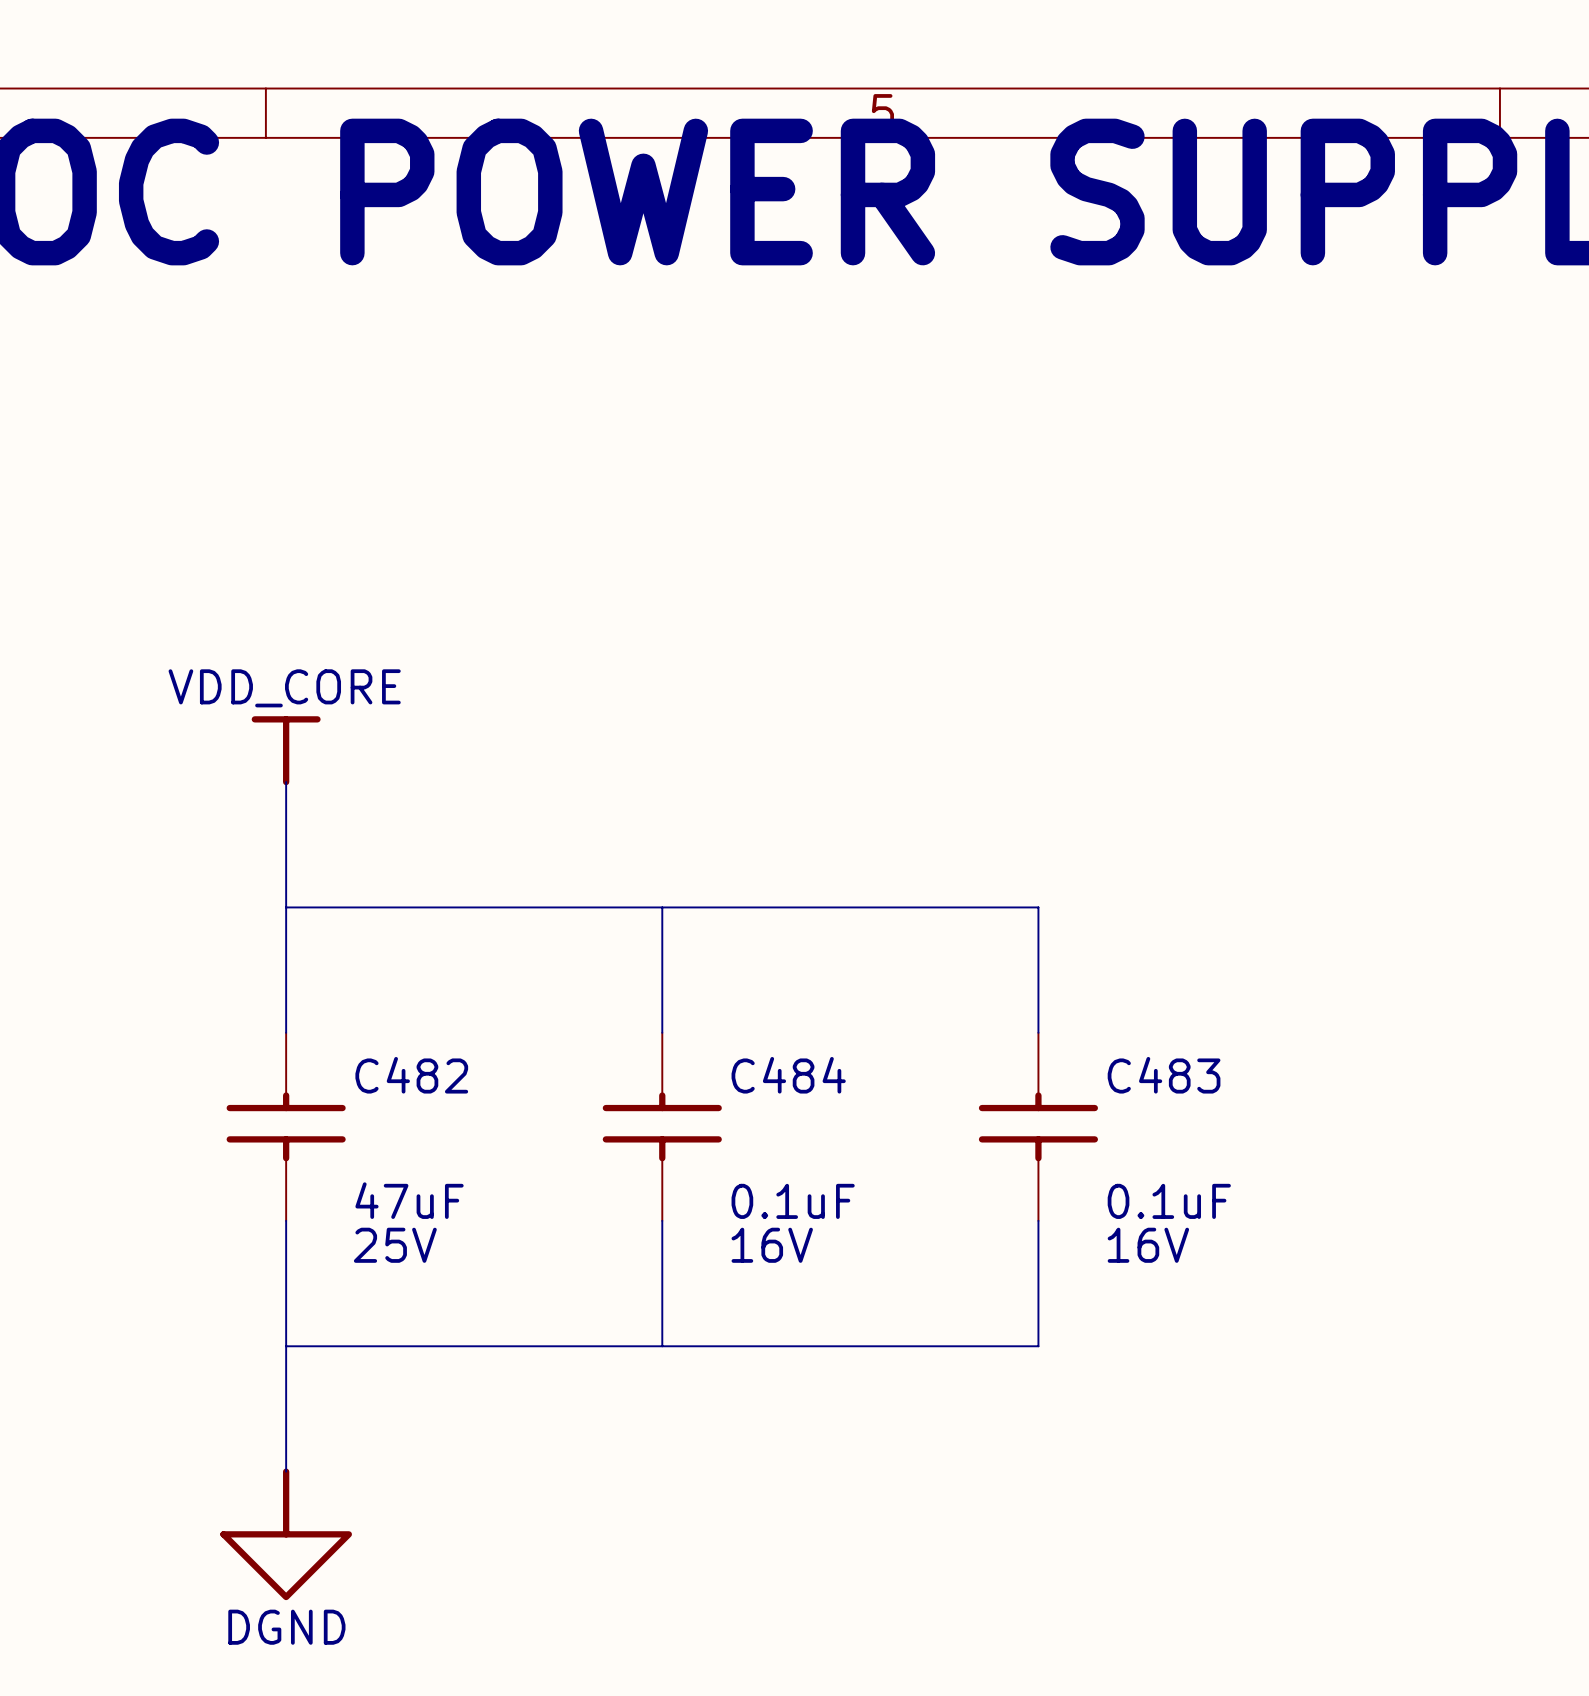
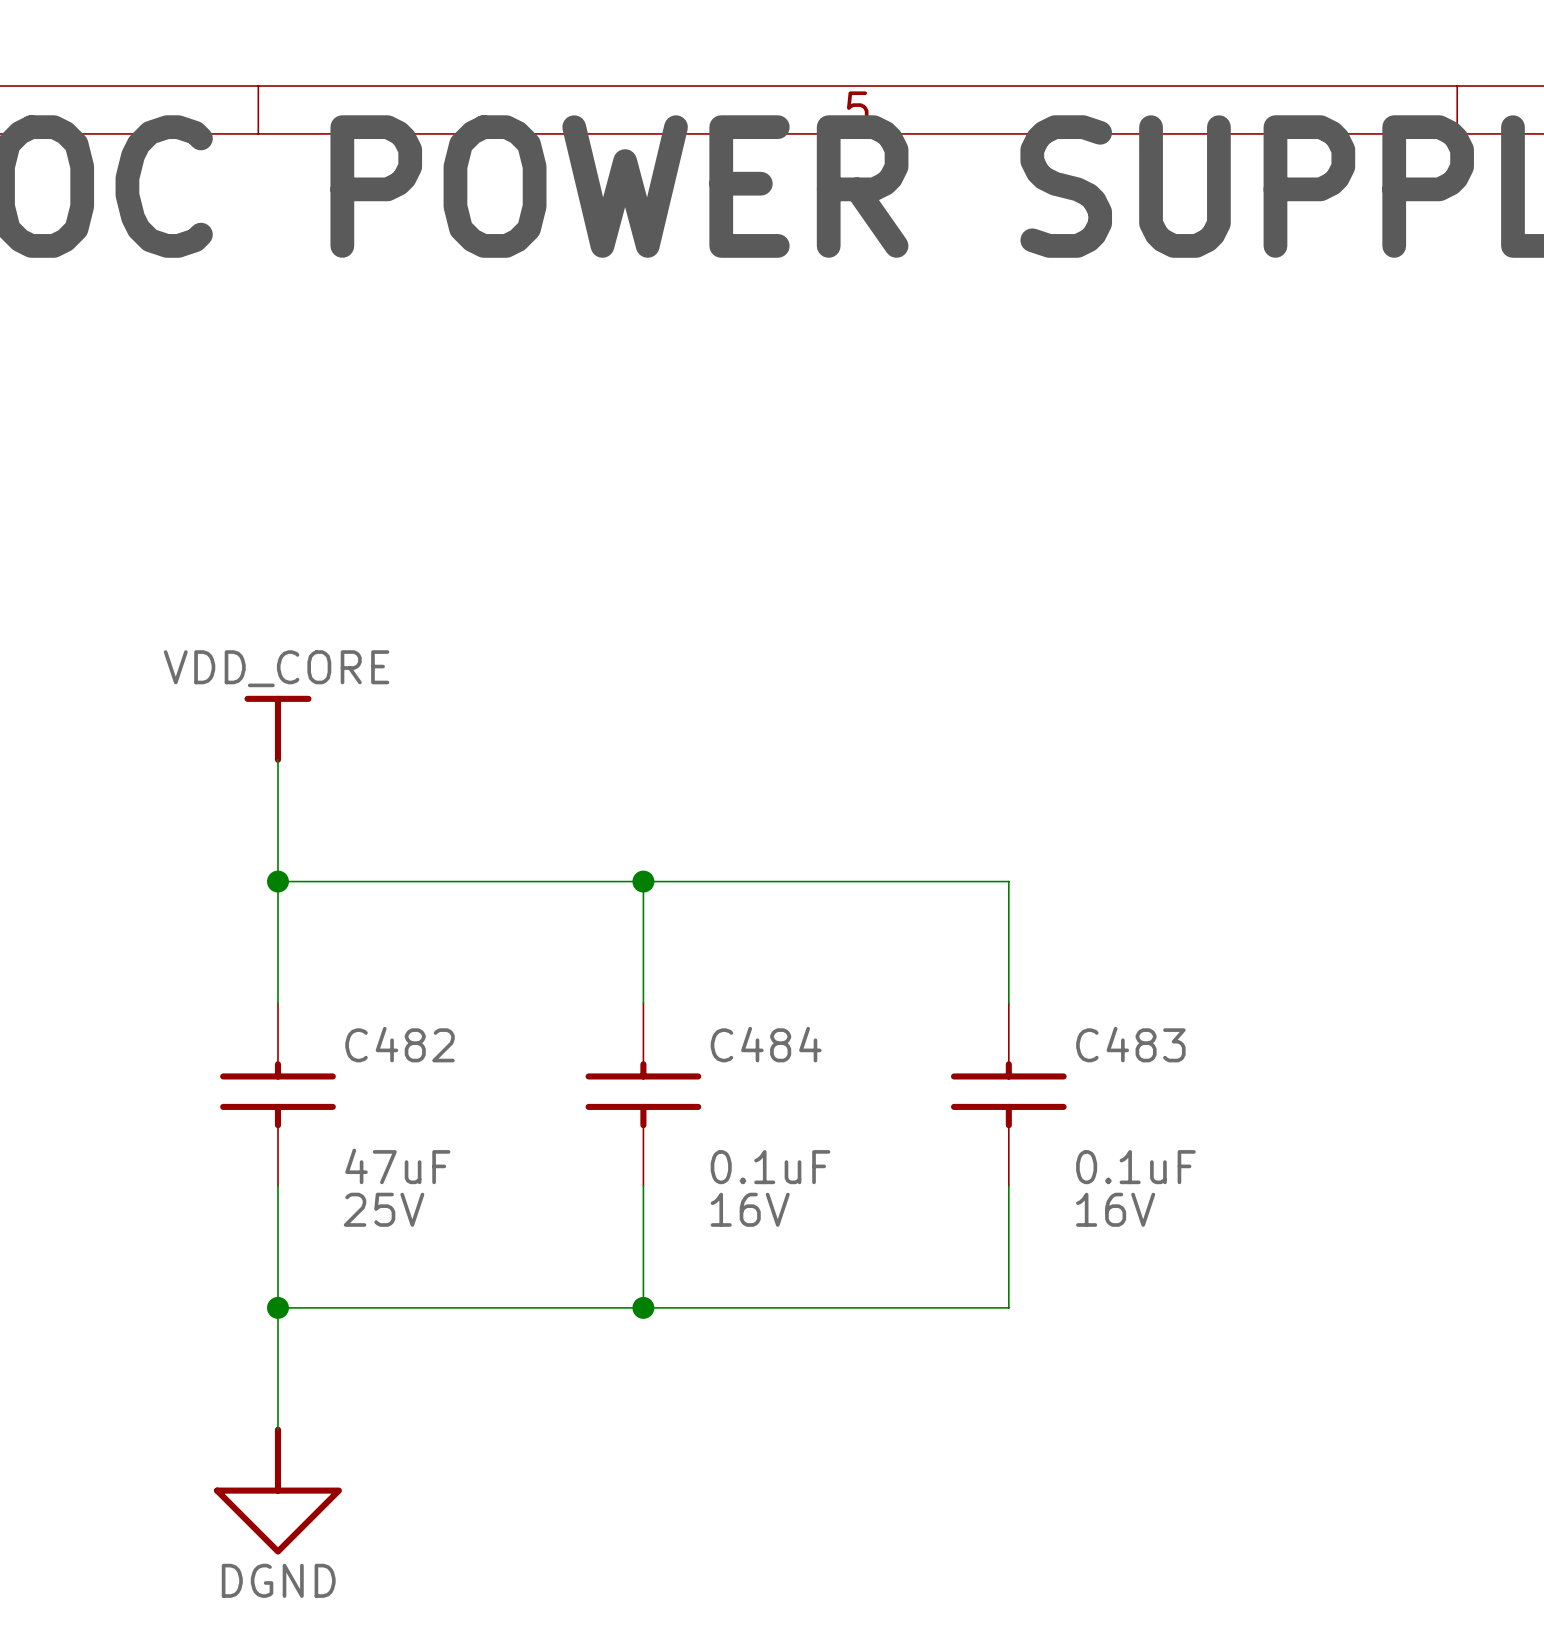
junction: none -> (277, 881)
junction: none -> (643, 881)
junction: none -> (277, 1307)
junction: none -> (643, 1307)

